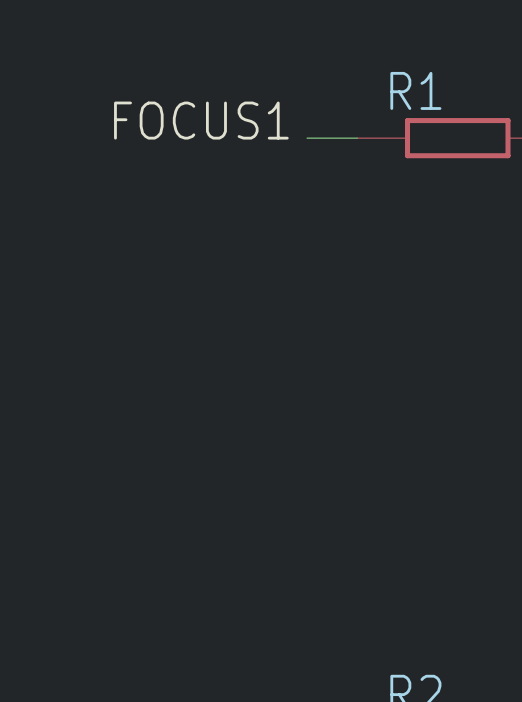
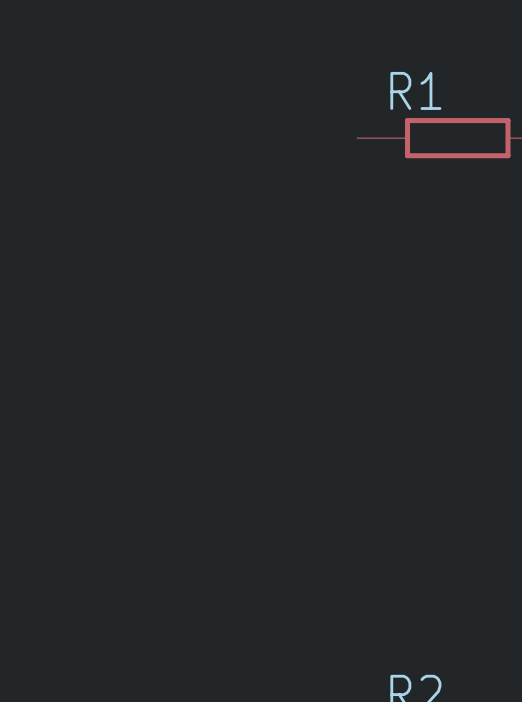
label: FOCUS1 (201, 120) -> none
wire: (307, 138) (357, 138) -> none

